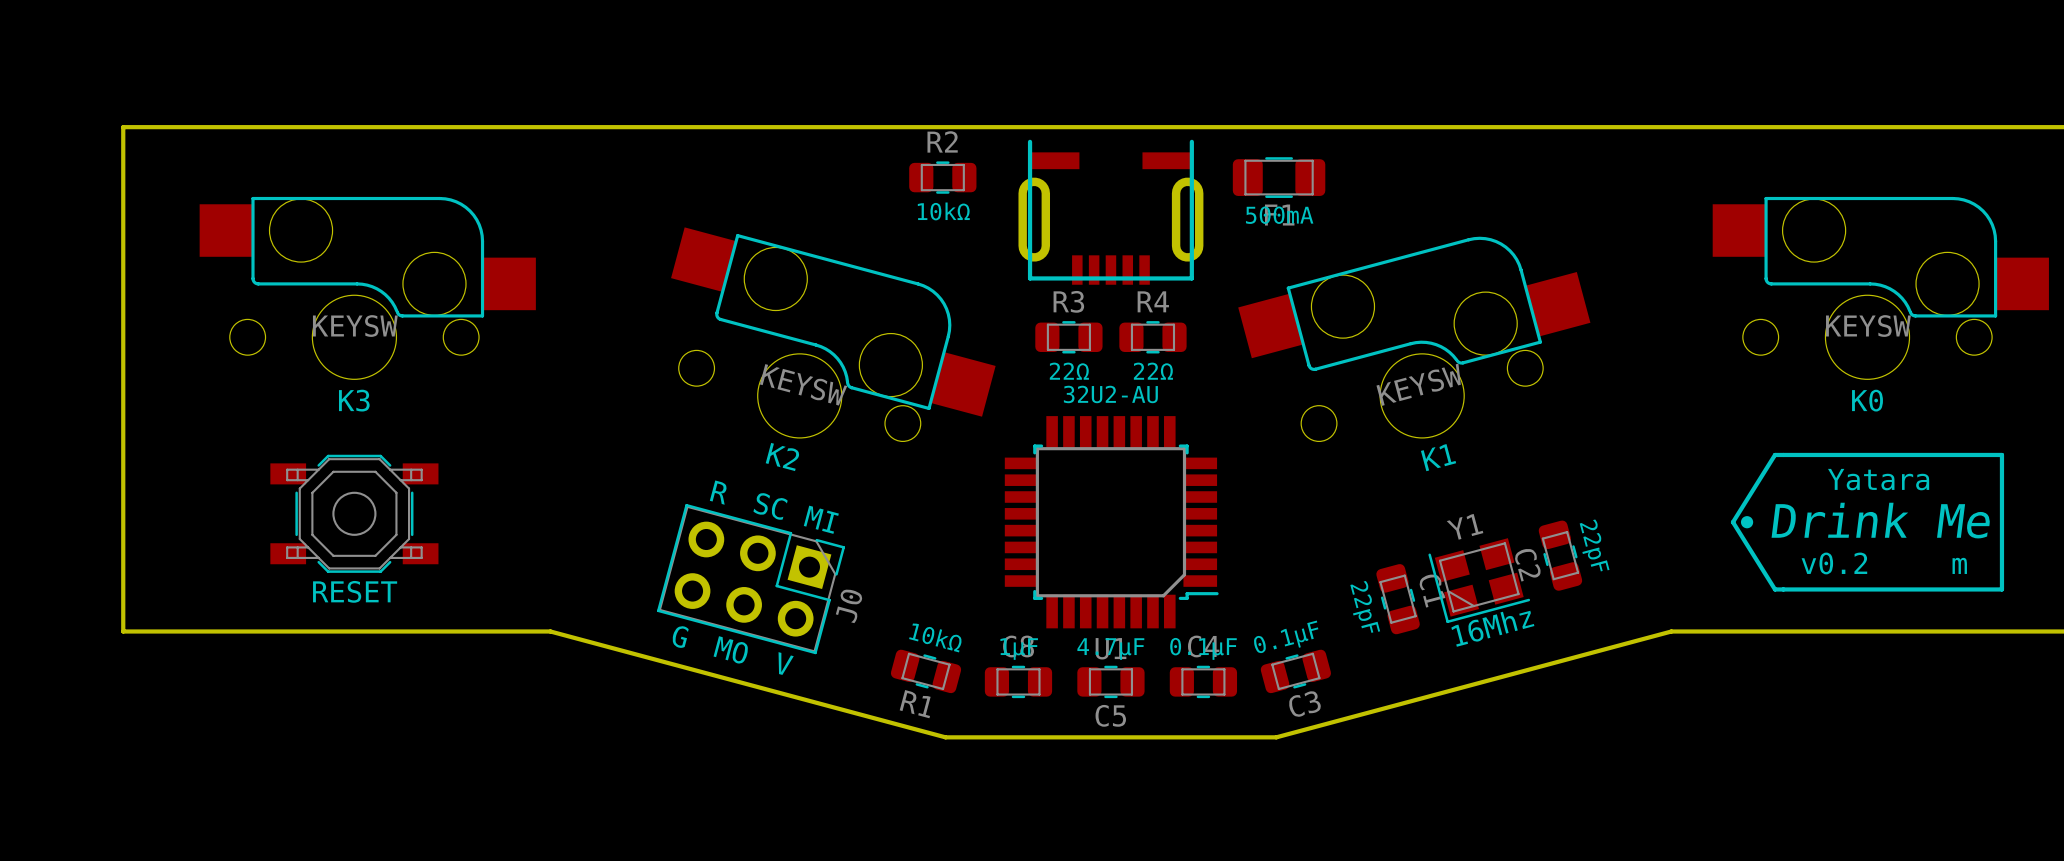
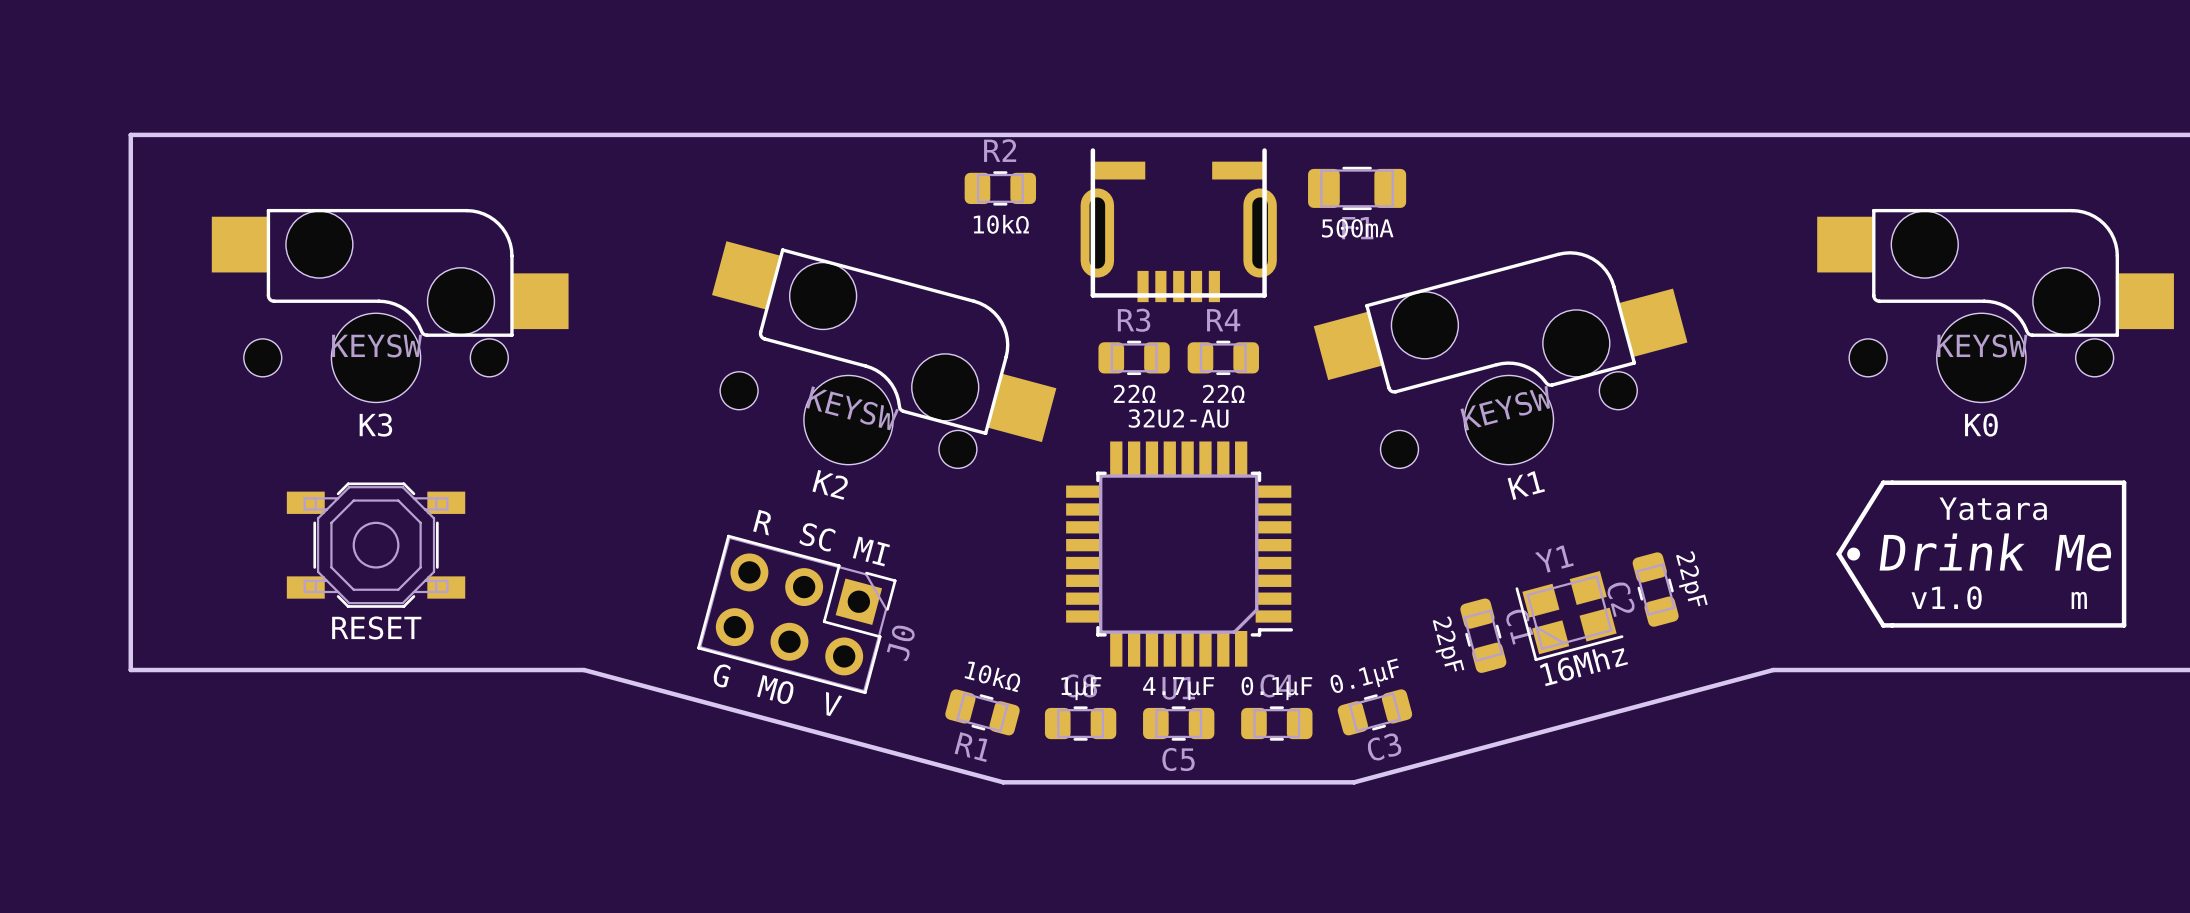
text: v0.2 (1834, 563) -> v1.0 (1946, 597)

